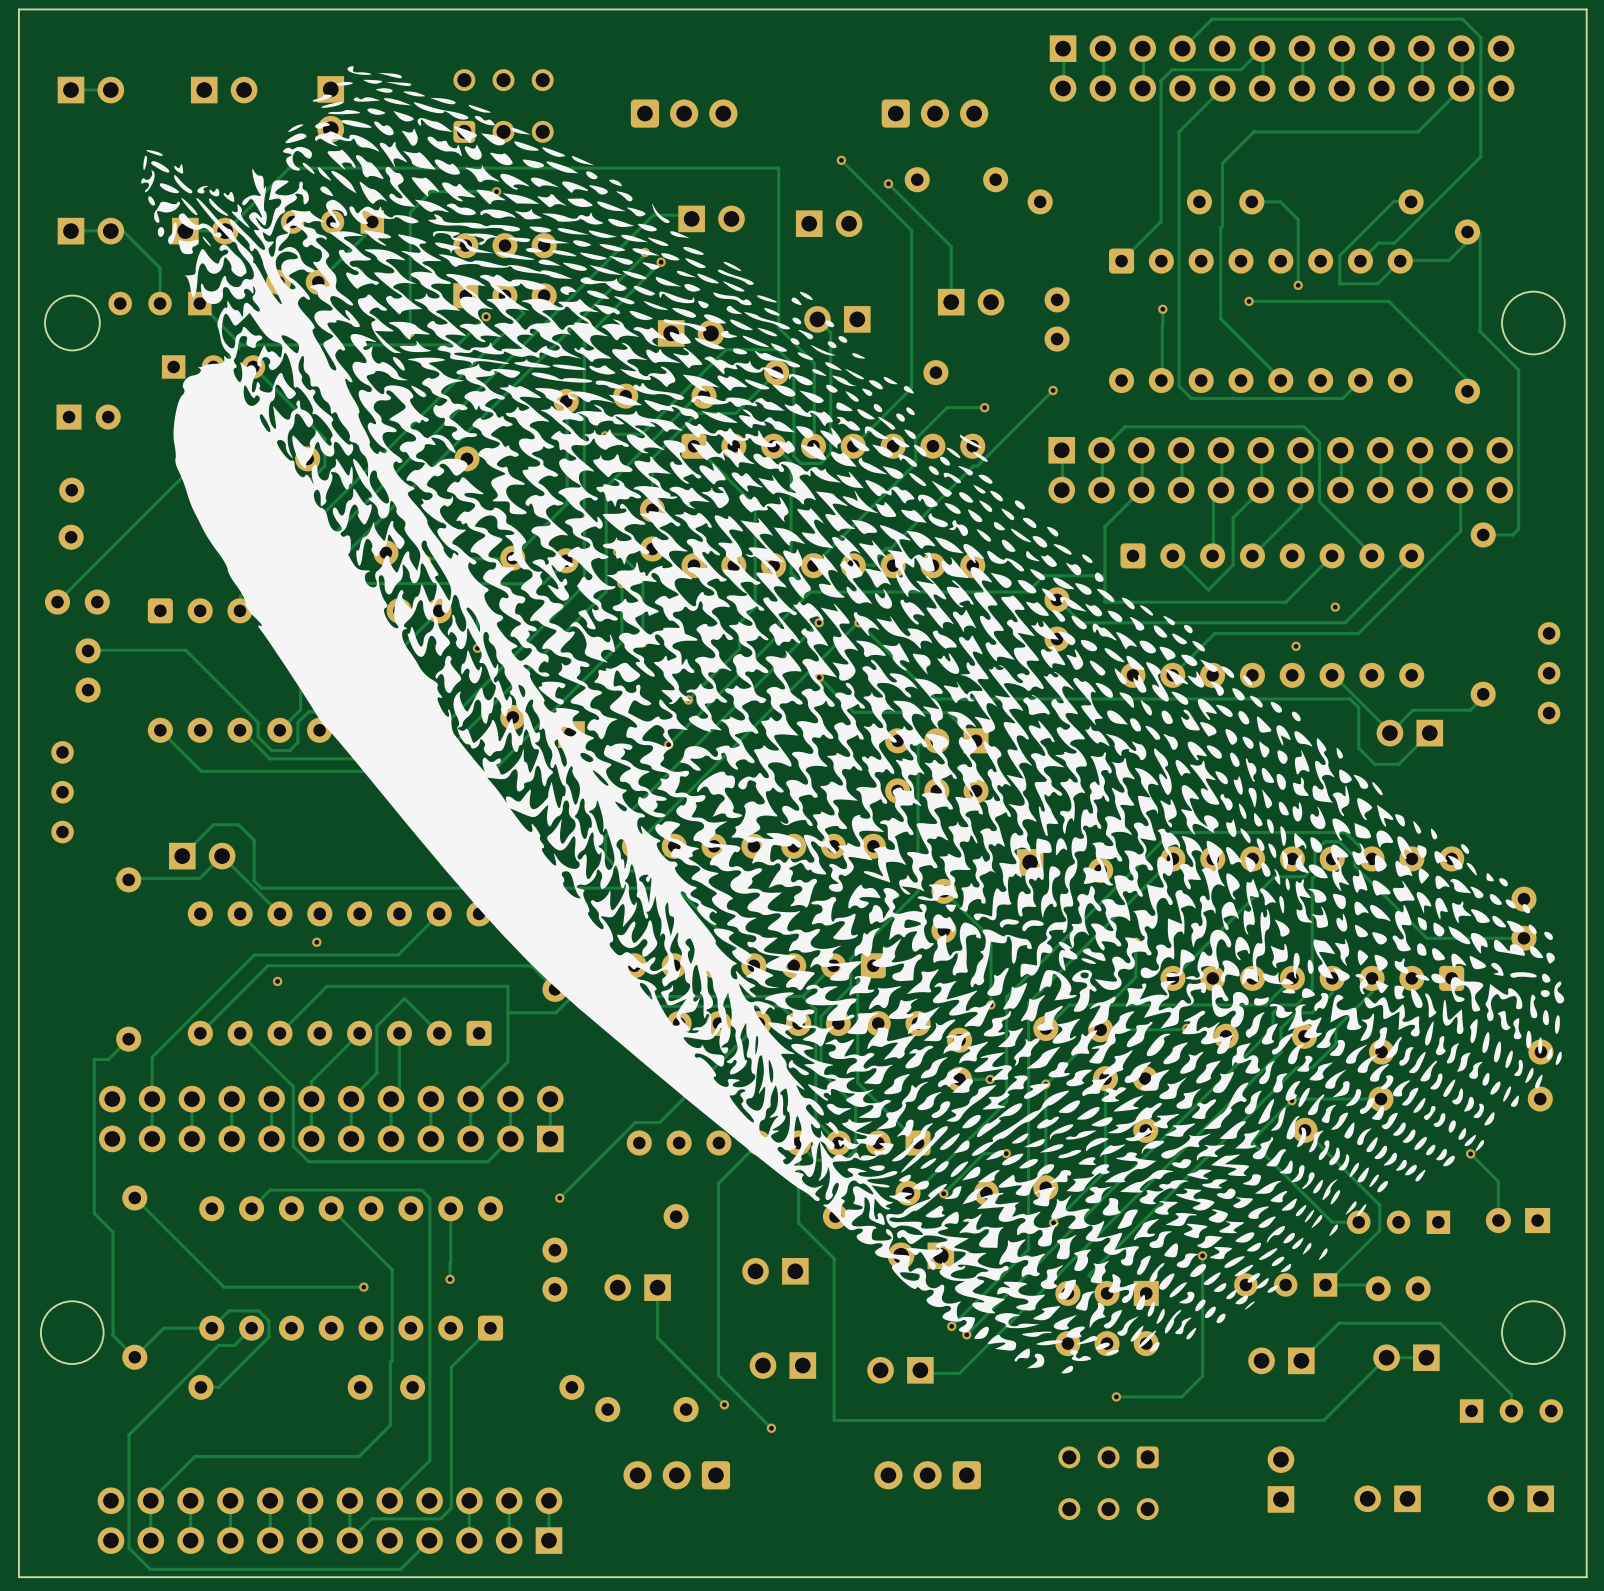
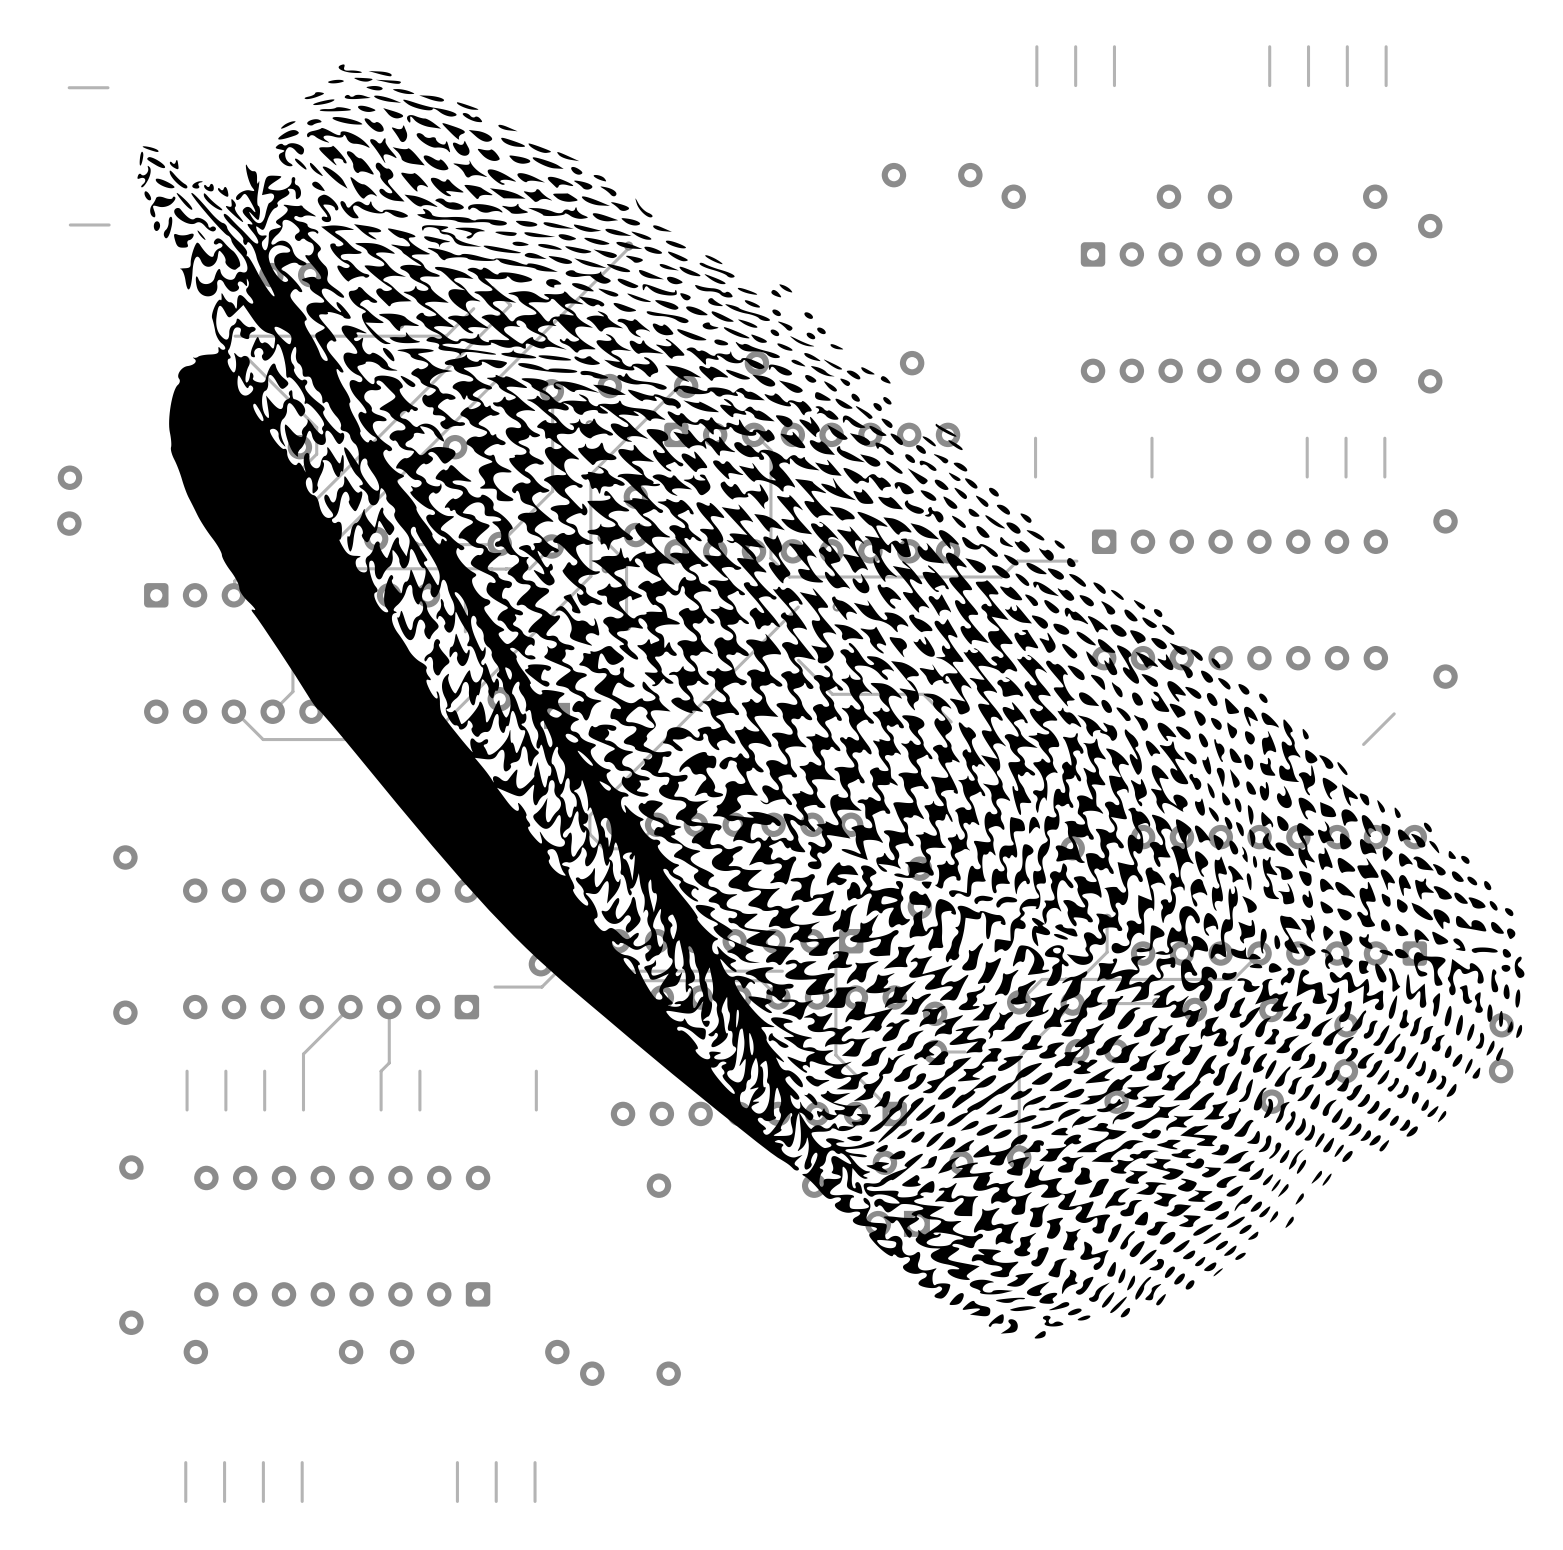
board edge: (1586, 9) (18, 9) (18, 1577) (1586, 1577) (1586, 9) -> none
track: (1183, 47) (1212, 19) (1462, 19) (1480, 37) (1480, 156) (1394, 243) (1378, 243) (1361, 260) -> none
track: (1462, 47) (1462, 87) (1417, 131) (1253, 131) (1222, 163) (1220, 318) (1281, 379) -> none
part: (1282, 68) -> none
track: (1223, 87) (1179, 131) (1179, 386) (1191, 398) (1342, 398) (1361, 379) -> none
track: (1263, 87) (1263, 47) (1241, 69) (1172, 69) (1161, 80) (1161, 221) (1122, 260) -> none
part: (90, 90) -> none
part: (224, 90) -> none
part: (503, 105) -> none
part: (330, 109) -> none
part: (684, 113) -> none
part: (934, 113) -> none
track: (841, 160) (911, 230) (911, 388) (854, 445) -> none
via: (841, 160) -> none
track: (888, 183) (951, 246) (951, 302) -> none
via: (888, 183) -> none
track: (496, 191) (431, 191) (410, 212) (410, 332) -> none
via: (496, 191) -> none
track: (1251, 201) (1280, 201) (1298, 219) (1298, 285) -> none
track: (1411, 201) (1394, 201) (1339, 255) (1339, 283) (1377, 283) (1401, 260) (1449, 260) (1478, 231) (1480, 233) (1480, 331) (1518, 370) (1518, 529) (1512, 534) (1495, 534) -> none
track: (692, 218) (689, 215) (653, 215) (331, 536) (331, 560) (316, 575) (300, 575) (280, 595) (280, 610) -> none
part: (711, 218) -> none
part: (332, 222) -> none
track: (372, 222) (372, 228) (318, 282) -> none
part: (829, 223) -> none
track: (186, 230) (226, 230) (289, 168) (778, 168) (778, 327) (814, 363) (814, 445) -> none
part: (90, 231) -> none
track: (110, 231) (123, 231) (160, 267) (160, 303) -> none
part: (205, 231) -> none
track: (661, 262) (584, 339) (584, 585) (439, 729) -> none
via: (661, 262) -> none
part: (504, 270) -> none
via: (1298, 285) -> none
round board edge: [1501, 291, 1566, 355] -> none
round board edge: [44, 295, 101, 351] -> none
track: (1249, 301) (1388, 301) (1478, 390) -> none
via: (1249, 301) -> none
part: (971, 302) -> none
part: (160, 303) -> none
track: (199, 303) (241, 344) (229, 356) (229, 429) (57, 602) -> none
track: (1162, 309) (1162, 379) -> none
via: (1162, 309) -> none
via: (486, 316) -> none
track: (817, 319) (830, 332) (830, 453) (820, 463) (801, 463) (793, 456) (793, 365) (778, 349) (726, 349) (641, 434) (605, 434) -> none
part: (837, 319) -> none
part: (1057, 319) -> none
part: (691, 333) -> none
part: (213, 366) -> none
track: (776, 372) (735, 413) (697, 413) (652, 458) (652, 509) -> none
track: (1053, 390) (977, 466) (973, 466) (890, 548) (885, 548) (875, 558) (874, 565) (854, 565) -> none
via: (1053, 390) -> none
track: (981, 407) (947, 407) (915, 439) (915, 463) (813, 565) -> none
via: (984, 407) -> none
part: (88, 417) -> none
track: (694, 445) (755, 505) (755, 607) (739, 622) (739, 648) (688, 700) -> none
track: (1142, 449) (1142, 489) (1104, 526) (1104, 602) (1285, 602) (1332, 555) -> none
track: (1221, 449) (1221, 489) (1213, 497) (1213, 555) -> none
track: (1261, 449) (1261, 489) (1233, 517) (1233, 565) (1208, 589) (1173, 555) -> none
track: (1301, 449) (1301, 507) (1253, 555) -> none
track: (1460, 449) (1460, 531) (1358, 633) (1214, 633) (1173, 674) -> none
part: (1280, 470) -> none
track: (1102, 489) (1102, 449) (1125, 426) (1304, 426) (1319, 442) (1319, 502) (1372, 555) -> none
track: (1412, 555) (1344, 622) (1081, 622) (1057, 599) -> none
track: (621, 583) (621, 642) (492, 771) (201, 771) (160, 730) -> none
track: (810, 592) (779, 622) (779, 634) (668, 744) -> none
part: (77, 602) -> none
via: (1335, 607) -> none
track: (439, 610) (338, 711) (308, 711) (297, 722) (297, 742) (289, 750) (271, 750) (258, 736) (258, 722) (185, 650) (88, 650) -> none
part: (1057, 619) -> none
via: (819, 622) -> none
via: (1296, 646) -> none
via: (477, 648) -> none
part: (88, 670) -> none
part: (1549, 673) -> none
track: (1333, 674) (1390, 732) (1413, 710) (1470, 710) (1486, 694) -> none
via: (819, 677) -> none
via: (688, 700) -> none
track: (931, 732) (918, 746) (918, 891) (850, 958) (850, 986) (820, 1016) (820, 1071) (855, 1106) (855, 1150) (845, 1160) (815, 1160) (798, 1143) (798, 1223) (834, 1258) (834, 1420) (1323, 1420) (1386, 1357) (1426, 1357) -> none
part: (1409, 733) -> none
via: (668, 744) -> none
track: (1374, 763) (1358, 748) (1358, 707) (1349, 698) (935, 698) (857, 622) (634, 846) -> none
track: (1399, 764) (1374, 764) -> none
part: (936, 765) -> none
part: (62, 792) -> none
track: (182, 856) (213, 824) (238, 824) (254, 840) (254, 880) (261, 888) (676, 888) (753, 965) -> none
part: (202, 856) -> none
track: (1172, 858) (1028, 1003) (1028, 1249) (951, 1326) -> none
track: (1332, 858) (1312, 878) (1312, 989) (1296, 1004) (1280, 1004) (1273, 1012) (1273, 1028) (966, 1334) -> none
track: (1372, 858) (1345, 832) (1171, 832) (1006, 997) (1006, 1101) (915, 1193) (908, 1193) -> none
part: (1030, 862) -> none
track: (116, 878) (199, 878) (222, 856) (279, 913) -> none
track: (943, 891) (990, 938) (990, 1004) -> none
track: (439, 913) (398, 954) (254, 954) (152, 1057) (152, 1138) -> none
part: (1523, 918) -> none
track: (1523, 938) (1427, 938) (1354, 866) (1354, 857) (1339, 841) (1325, 841) (1314, 851) (1314, 866) (1304, 876) (1274, 876) (1172, 978) -> none
via: (316, 942) -> none
track: (833, 965) (802, 996) (815, 1009) (815, 1120) (838, 1143) -> none
track: (1332, 978) (1332, 992) (1312, 1012) (1296, 1012) (1280, 1028) (1280, 1052) (959, 1373) (923, 1373) (920, 1370) -> none
track: (1372, 978) (1372, 992) (1335, 1028) (1335, 1044) (1312, 1067) (1296, 1067) (1088, 1275) (1107, 1293) -> none
via: (277, 981) -> none
track: (555, 989) (531, 965) (267, 965) (200, 1033) -> none
via: (990, 1004) -> none
track: (758, 1023) (659, 1122) (635, 1122) (559, 1198) -> none
track: (240, 1033) (293, 1086) (293, 1146) (308, 1161) (487, 1161) (510, 1138) (510, 1099) -> none
track: (279, 1033) (327, 986) (507, 986) (507, 1061) (470, 1099) (470, 1138) -> none
track: (439, 1033) (404, 998) (376, 1026) (376, 1073) (351, 1099) (351, 1138) -> none
track: (128, 1039) (108, 1059) (94, 1059) (94, 1213) (113, 1232) (113, 1335) (134, 1357) (163, 1328) (211, 1328) (229, 1310) (258, 1310) (268, 1321) (268, 1337) (218, 1387) (200, 1387) -> none
track: (1105, 1078) (1105, 1171) (1053, 1222) -> none
via: (990, 1079) -> none
via: (1045, 1084) -> none
track: (1380, 1099) (1293, 1099) (1251, 1141) (1332, 1222) (1358, 1222) -> none
via: (1291, 1100) -> none
part: (331, 1119) -> none
track: (1305, 1130) (1379, 1205) (1379, 1230) (1325, 1284) (1374, 1284) (1378, 1288) -> none
track: (758, 1143) (718, 1183) (718, 1375) (771, 1428) -> none
track: (1006, 1153) (983, 1153) (943, 1193) -> none
via: (1006, 1153) -> none
track: (1470, 1153) (1498, 1181) (1498, 1220) -> none
via: (1470, 1153) -> none
via: (943, 1193) -> none
track: (134, 1197) (224, 1287) (363, 1287) -> none
via: (559, 1198) -> none
track: (251, 1208) (270, 1190) (421, 1190) (429, 1198) (429, 1460) (389, 1500) -> none
track: (331, 1208) (392, 1269) (390, 1425) (358, 1456) (194, 1456) (150, 1500) (150, 1540) -> none
track: (450, 1208) (450, 1279) -> none
part: (1518, 1220) -> none
via: (1053, 1222) -> none
part: (1398, 1222) -> none
track: (1202, 1255) (1202, 1376) (1181, 1396) (1116, 1396) -> none
via: (1202, 1255) -> none
part: (554, 1269) -> none
part: (775, 1271) -> none
via: (450, 1279) -> none
part: (1285, 1284) -> none
via: (363, 1287) -> none
part: (637, 1287) -> none
track: (657, 1287) (657, 1337) (724, 1404) -> none
part: (1398, 1288) -> none
round board edge: [40, 1300, 104, 1365] -> none
round board edge: [1501, 1300, 1566, 1365] -> none
part: (1107, 1318) -> none
via: (951, 1326) -> none
track: (251, 1328) (234, 1345) (218, 1345) (129, 1434) (129, 1548) (150, 1569) (400, 1569) (429, 1540) -> none
track: (490, 1328) (451, 1367) (451, 1508) (440, 1518) (371, 1518) (349, 1540) (349, 1500) -> none
via: (966, 1334) -> none
part: (1406, 1357) -> none
part: (1281, 1360) -> none
track: (1301, 1360) (1338, 1323) (1440, 1323) (1511, 1394) (1511, 1411) -> none
part: (782, 1365) -> none
part: (900, 1370) -> none
via: (1116, 1396) -> none
via: (724, 1404) -> none
part: (1511, 1411) -> none
via: (771, 1428) -> none
part: (676, 1475) -> none
part: (927, 1475) -> none
part: (1280, 1479) -> none
part: (1108, 1483) -> none
part: (1387, 1498) -> none
part: (1520, 1498) -> none
part: (329, 1520) -> none

